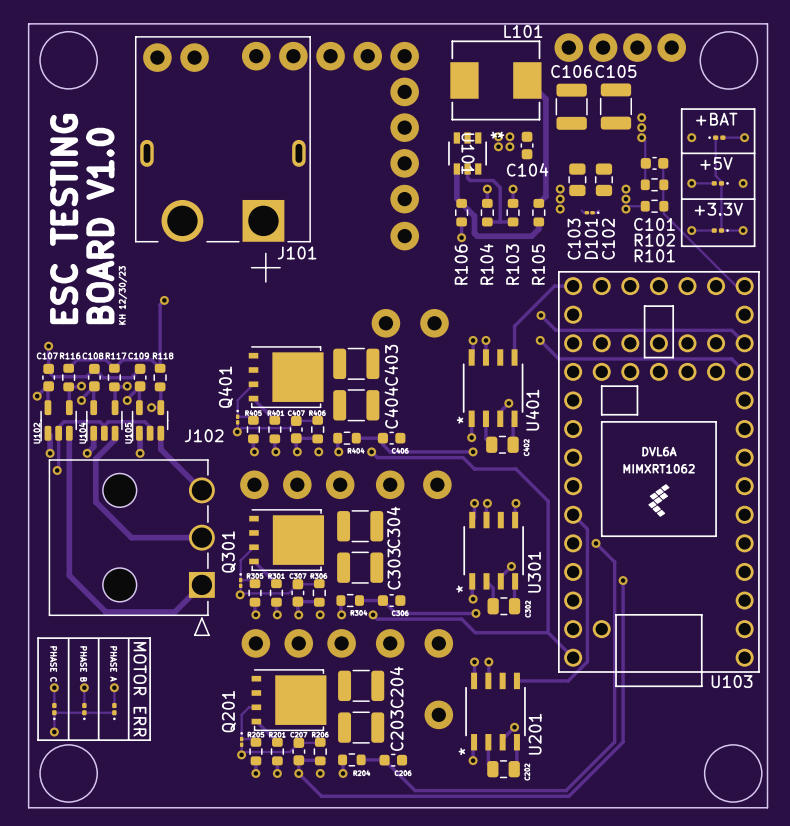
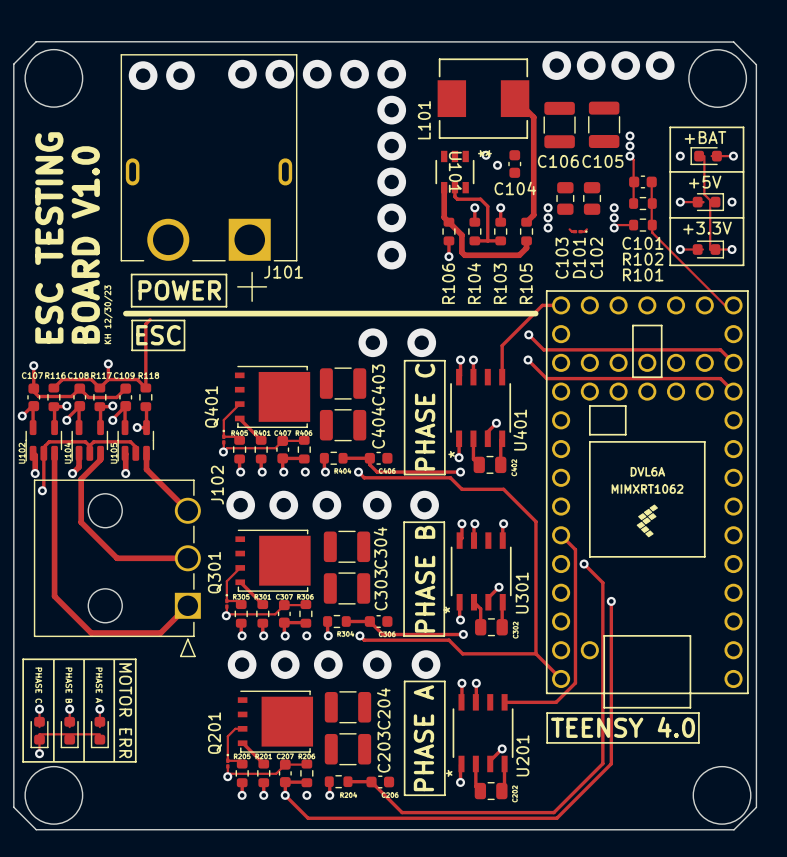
board edge: (28, 23) (767, 23) (767, 807) (28, 807) (28, 23) -> (36, 41) (13, 64) (13, 807) (36, 829) (734, 829) (756, 807) (756, 64) (733, 42) (36, 41)
L101 name rotation: 0° (523, 31) -> 90° counterclockwise (424, 120)
L101 name position: L101 (523, 31) -> L101 (424, 120)
C106 name position: C106 (571, 71) -> C106 (558, 161)
C105 name position: C105 (615, 71) -> C105 (602, 161)
part footprint: [708, 135, 726, 140] -> [690, 147, 722, 166]
via: (509, 136) -> none
via: (498, 146) -> none
part footprint: [711, 181, 729, 186] -> [692, 193, 725, 212]
part footprint: [711, 228, 729, 233] -> [692, 240, 725, 259]
line: none -> (131, 274) (226, 274) (226, 306) (131, 306) (131, 274)
text: none -> POWER (179, 290)
line: none -> (125, 313) (535, 313)
via position: (164, 300) -> (108, 363)
line: none -> (132, 320) (184, 320) (184, 350) (132, 350) (132, 320)
text: none -> ESC (158, 335)
line: none -> (404, 360) (404, 474) (444, 474) (444, 360) (404, 360)
track: none -> (108, 363) (108, 379)
text: none -> PHASE C (425, 417)
U401 text position: * (460, 420) -> * (451, 454)
J102 name rotation: 0° (204, 435) -> 90° counterclockwise (217, 485)
line: none -> (404, 522) (444, 522) (444, 636) (404, 636) (404, 522)
text: none -> PHASE B (425, 579)
line: none -> (404, 681) (444, 681) (444, 795) (404, 795) (404, 681)
U103 name: U103 (732, 681) -> none
line: none -> (547, 713) (698, 713) (698, 742) (547, 742) (547, 713)
part footprint: [52, 702, 57, 720] -> [30, 716, 49, 749]
part footprint: [82, 702, 87, 720] -> [60, 716, 79, 749]
part footprint: [112, 702, 117, 720] -> [90, 716, 109, 749]
text: none -> TEENSY 4.0 (623, 727)
via: (438, 714) -> none
text: none -> PHASE A (423, 738)

